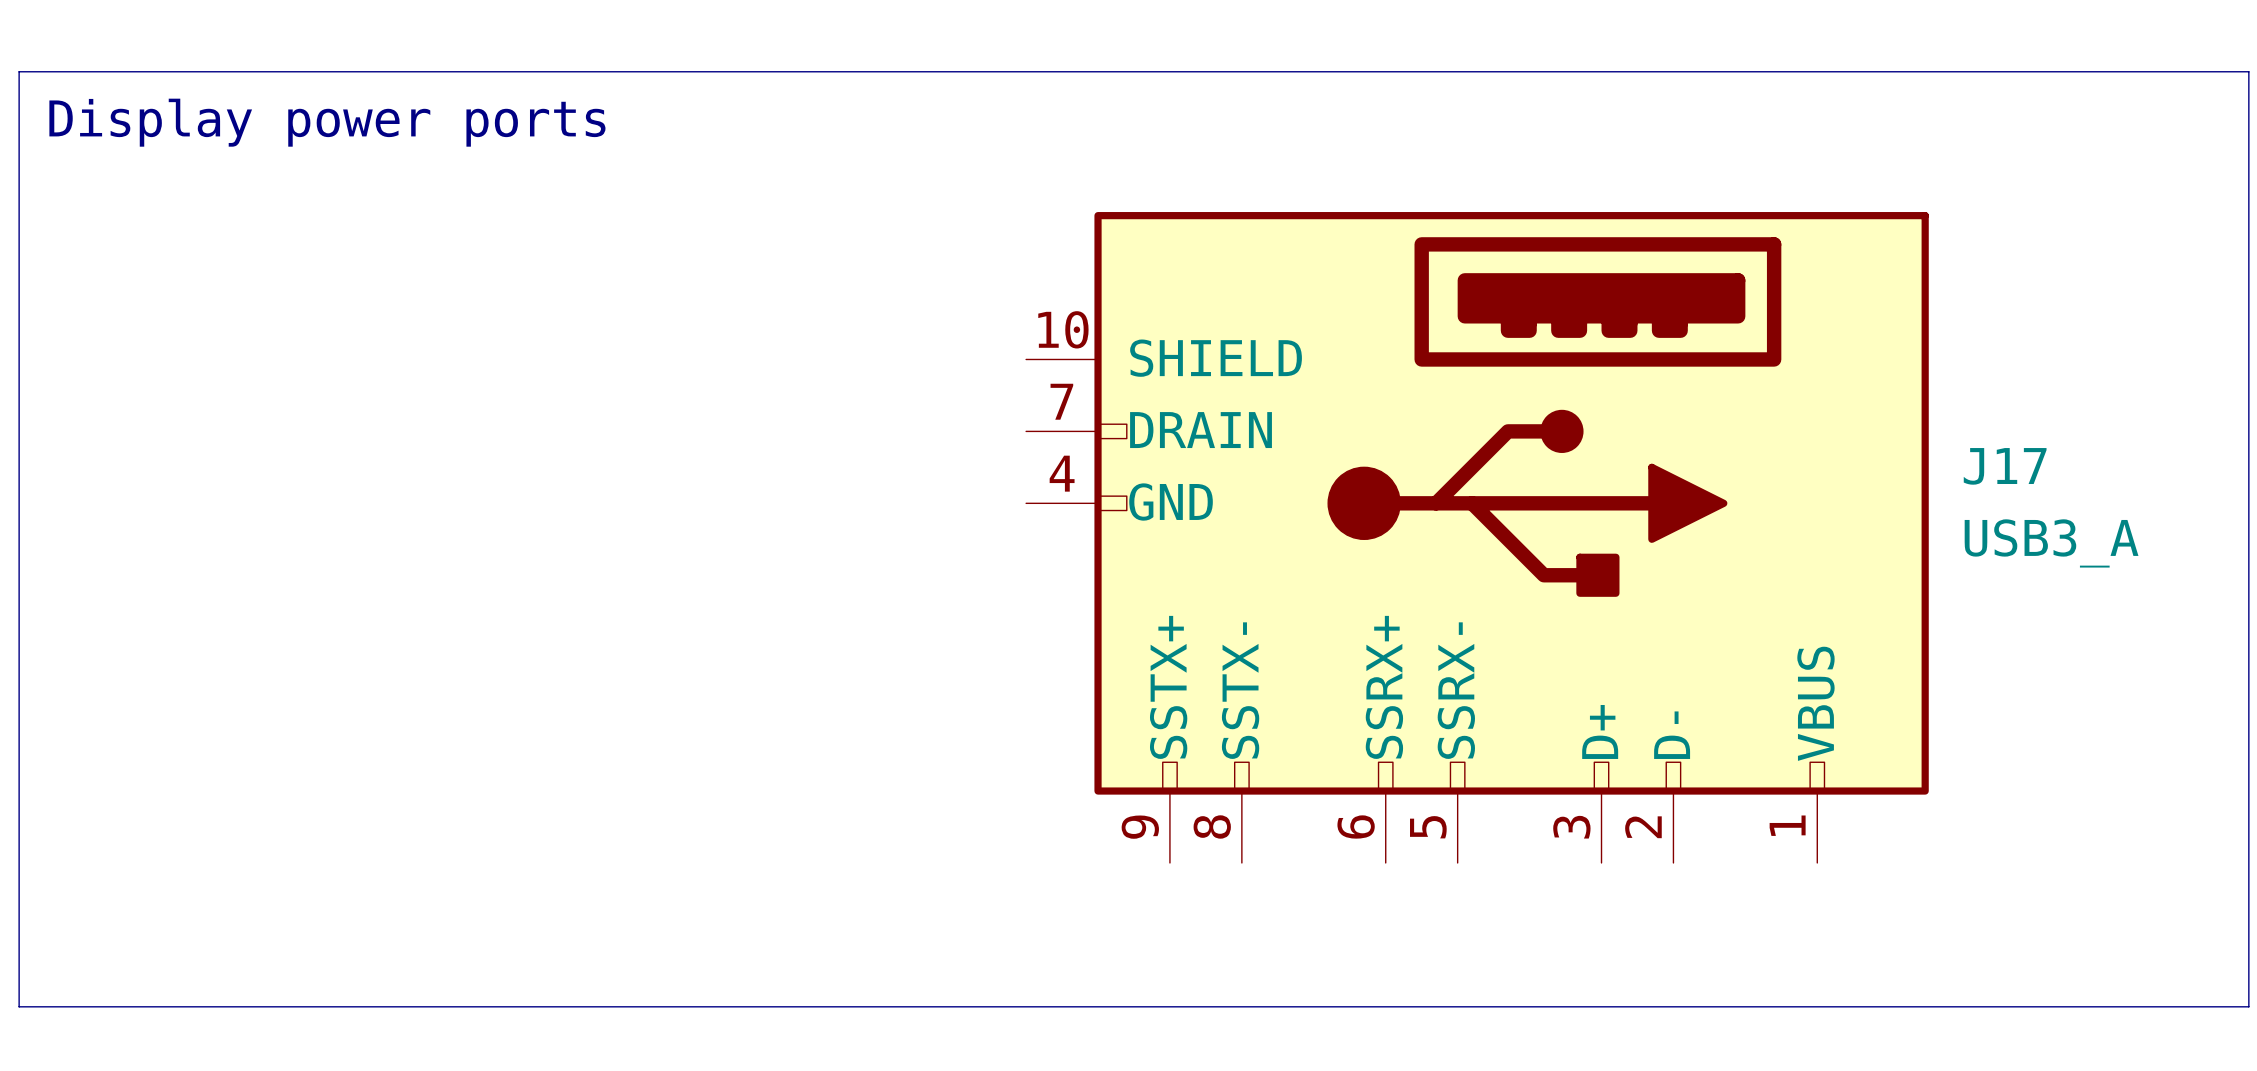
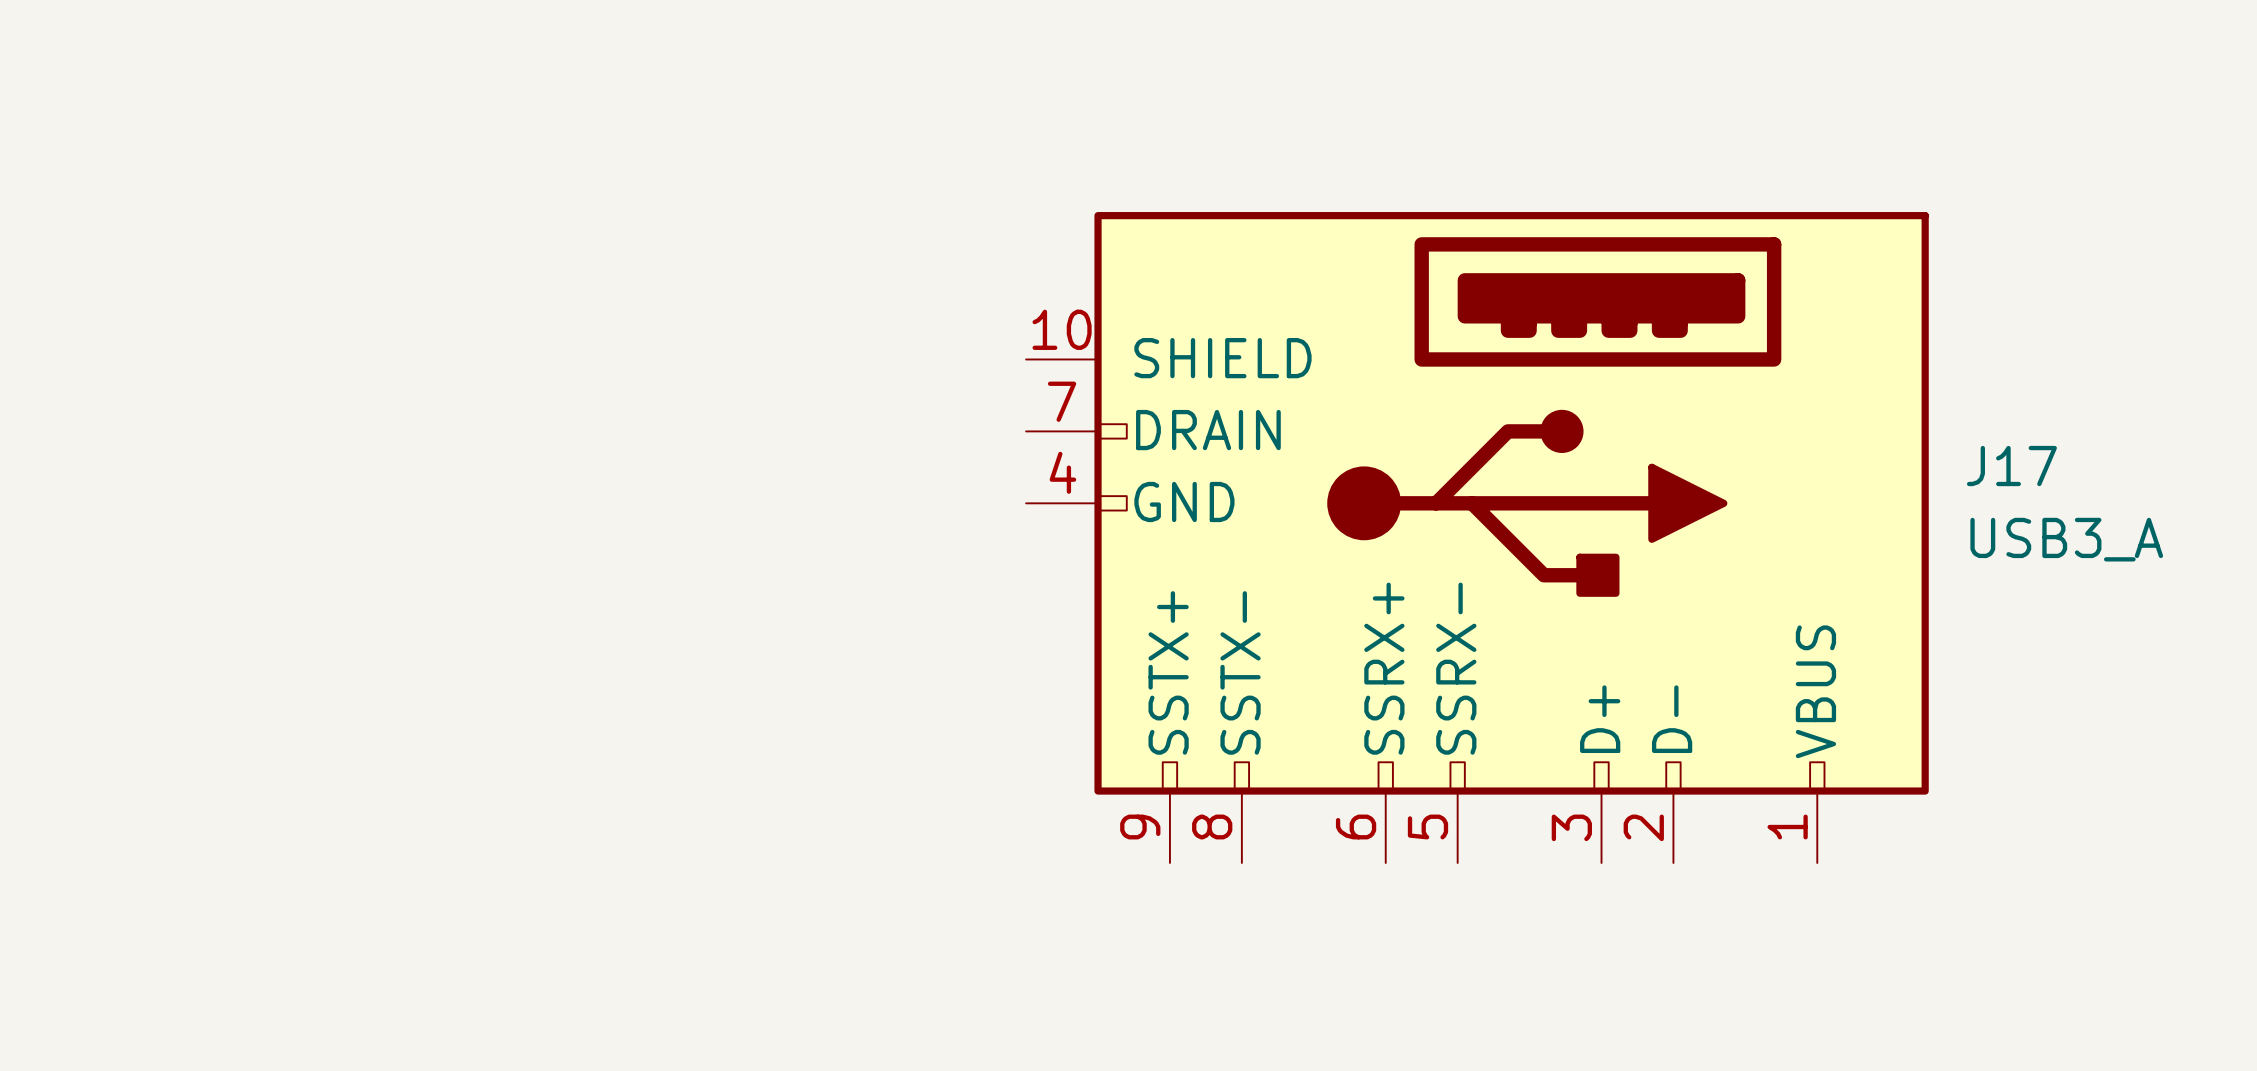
line: (19, 71) (2248, 71) (2248, 1006) (19, 1006) (19, 71) -> none
text: Display power ports (327, 122) -> none

